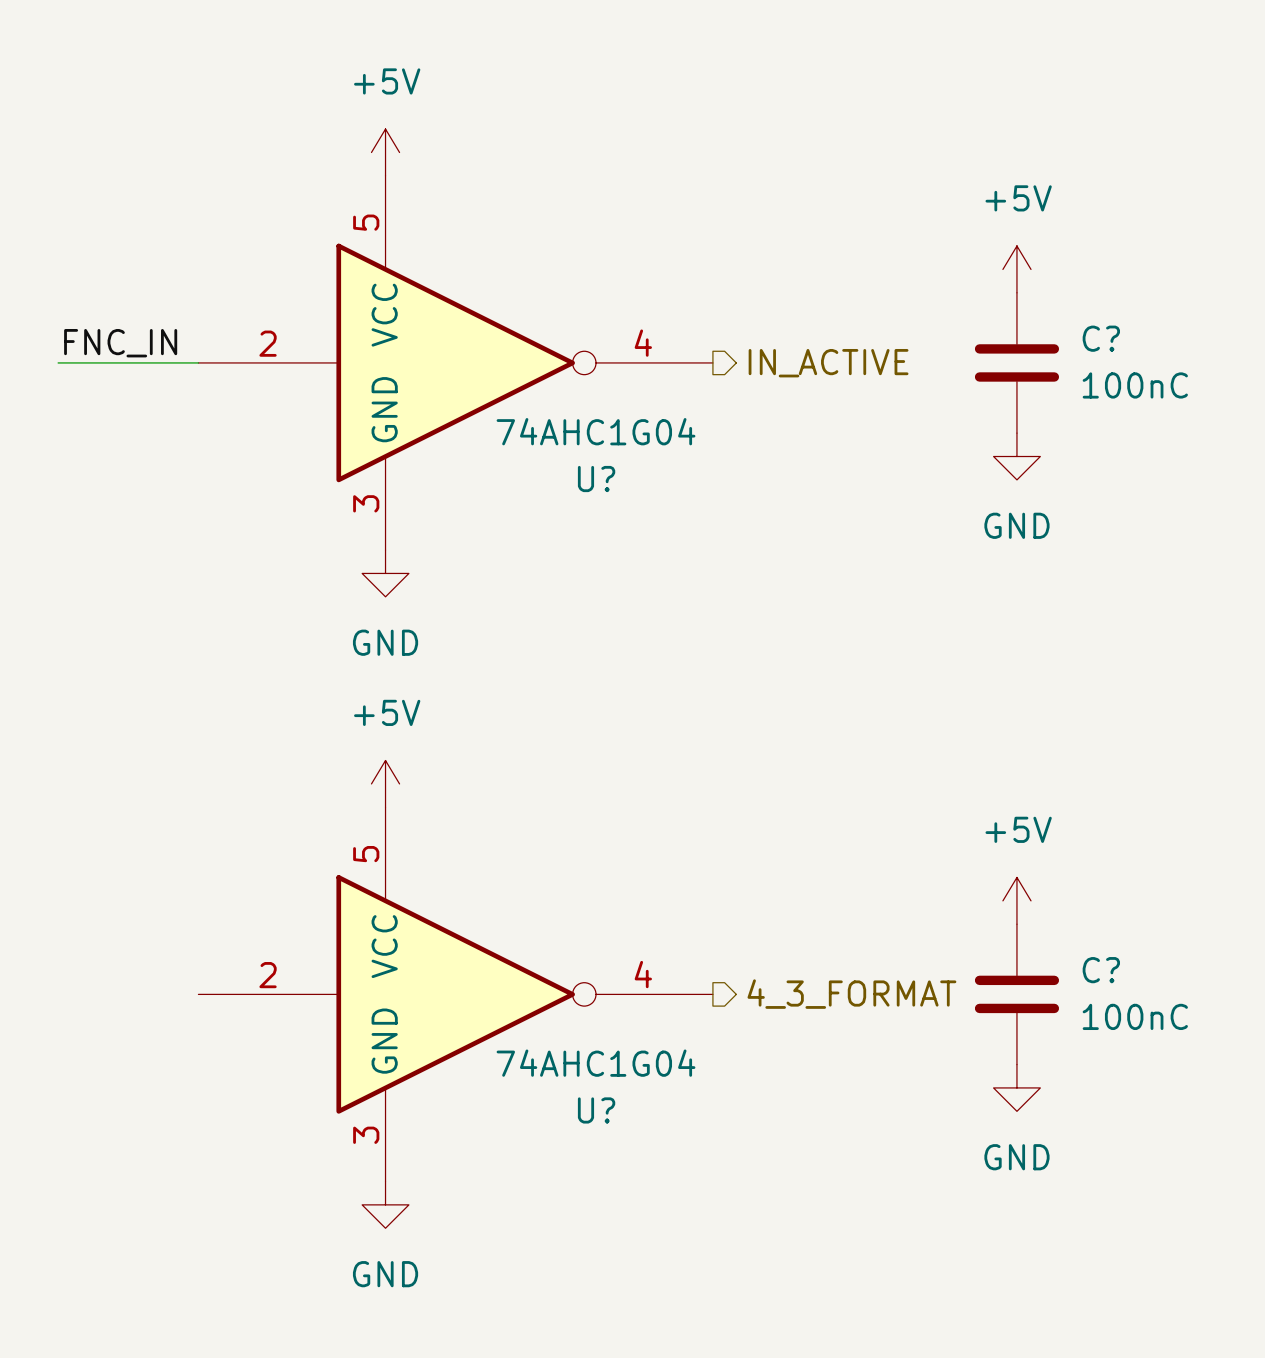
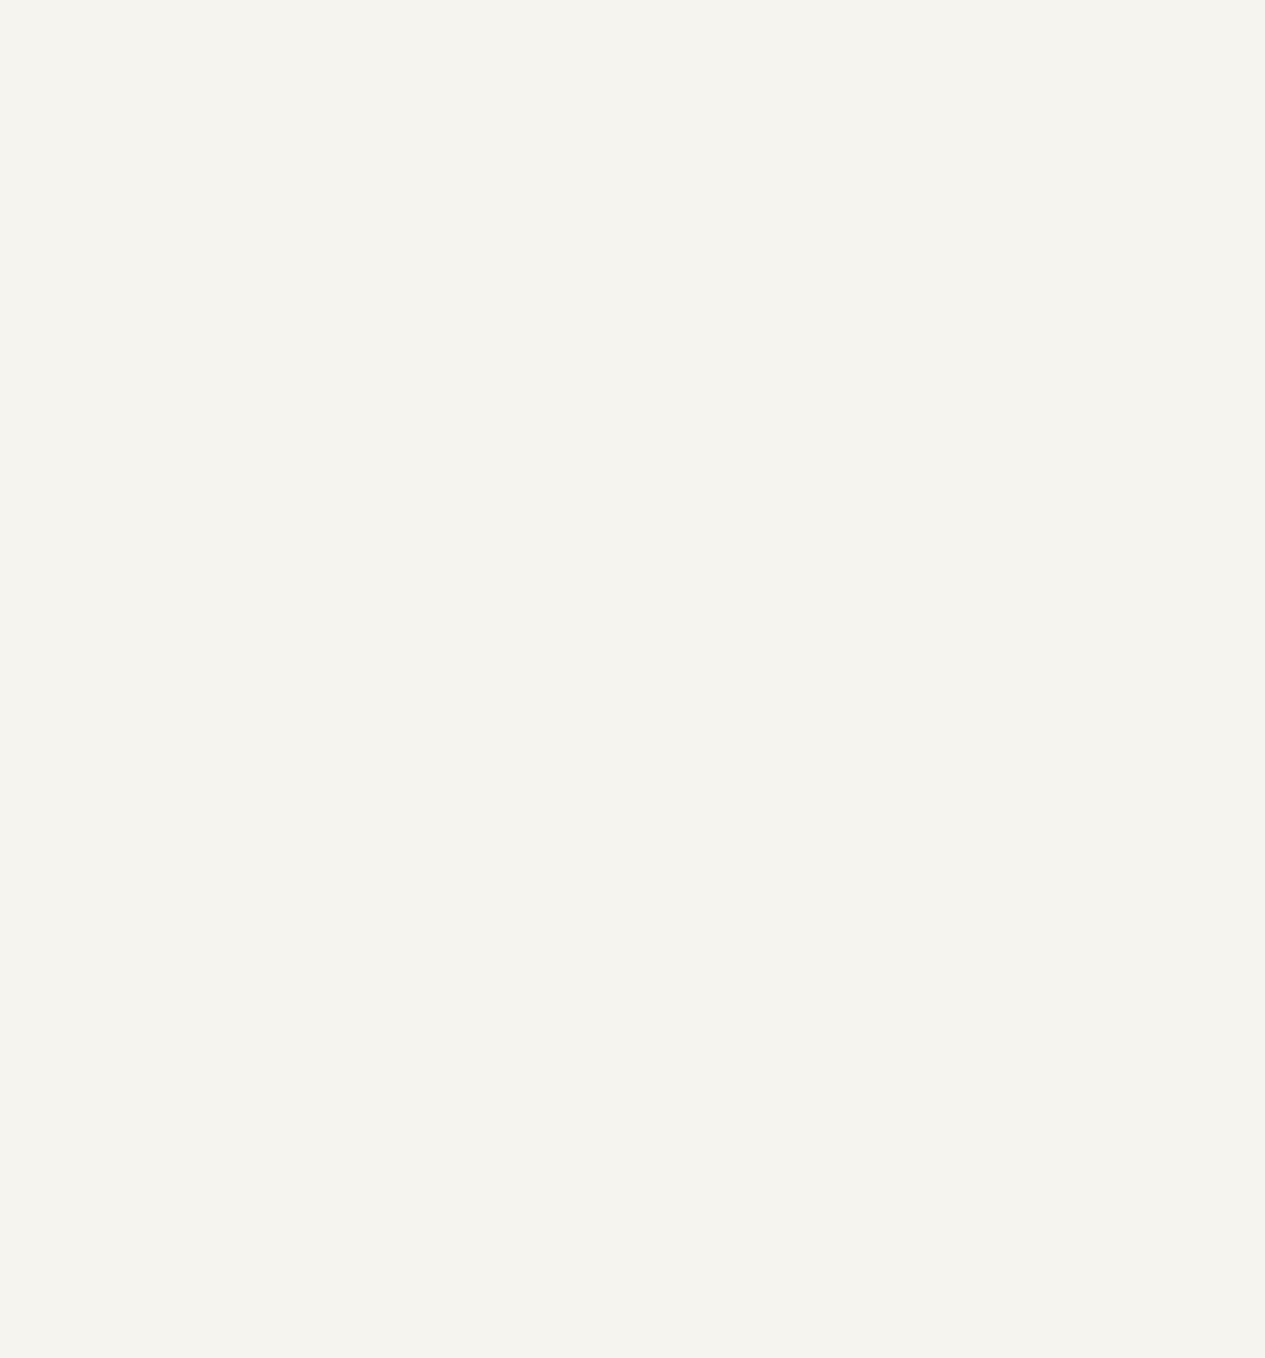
power symbol: +5V (385, 152) -> none
power symbol: +5V (1016, 269) -> none
label: FNC_IN (120, 343) -> none
wire: (58, 362) (198, 362) -> none
U?: 74AHC1G04 (455, 362) -> none
C?: 100nC (1016, 362) -> none
hierarchical label: IN_ACTIVE (828, 363) -> none
power symbol: GND (1016, 456) -> none
power symbol: GND (385, 573) -> none
power symbol: +5V (385, 783) -> none
power symbol: +5V (1016, 900) -> none
U?: 74AHC1G04 (455, 994) -> none
hierarchical label: 4_3_FORMAT (851, 994) -> none
C?: 100nC (1016, 994) -> none
power symbol: GND (1016, 1087) -> none
power symbol: GND (385, 1204) -> none

